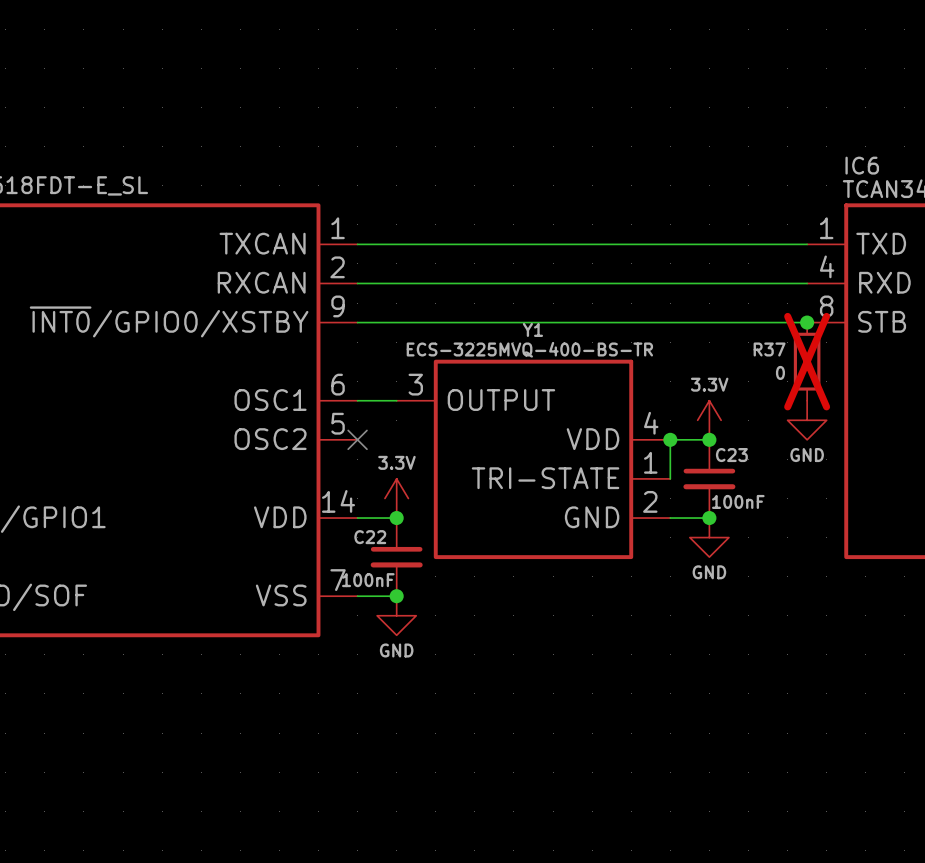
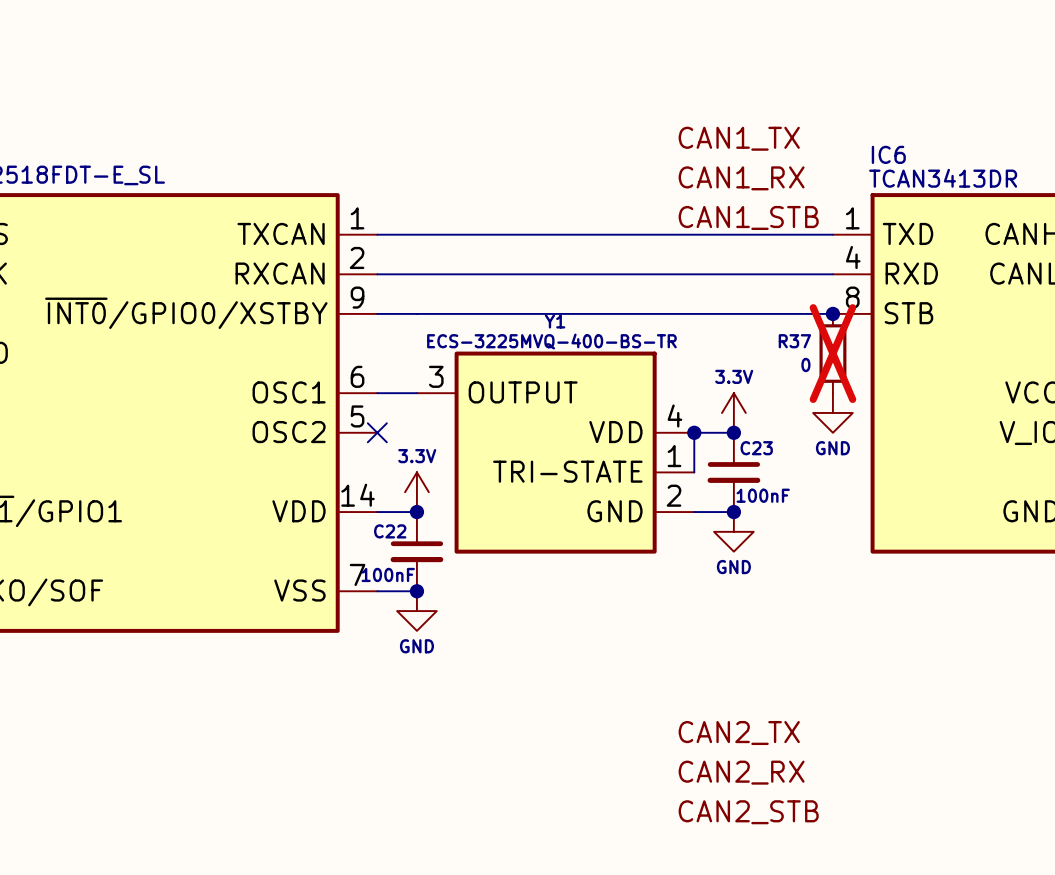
label: none -> CAN1_TX (739, 138)
label: none -> CAN1_RX (741, 178)
label: none -> CAN1_STB (748, 217)
label: none -> CAN2_TX (739, 733)
label: none -> CAN2_RX (741, 772)
label: none -> CAN2_STB (748, 812)

